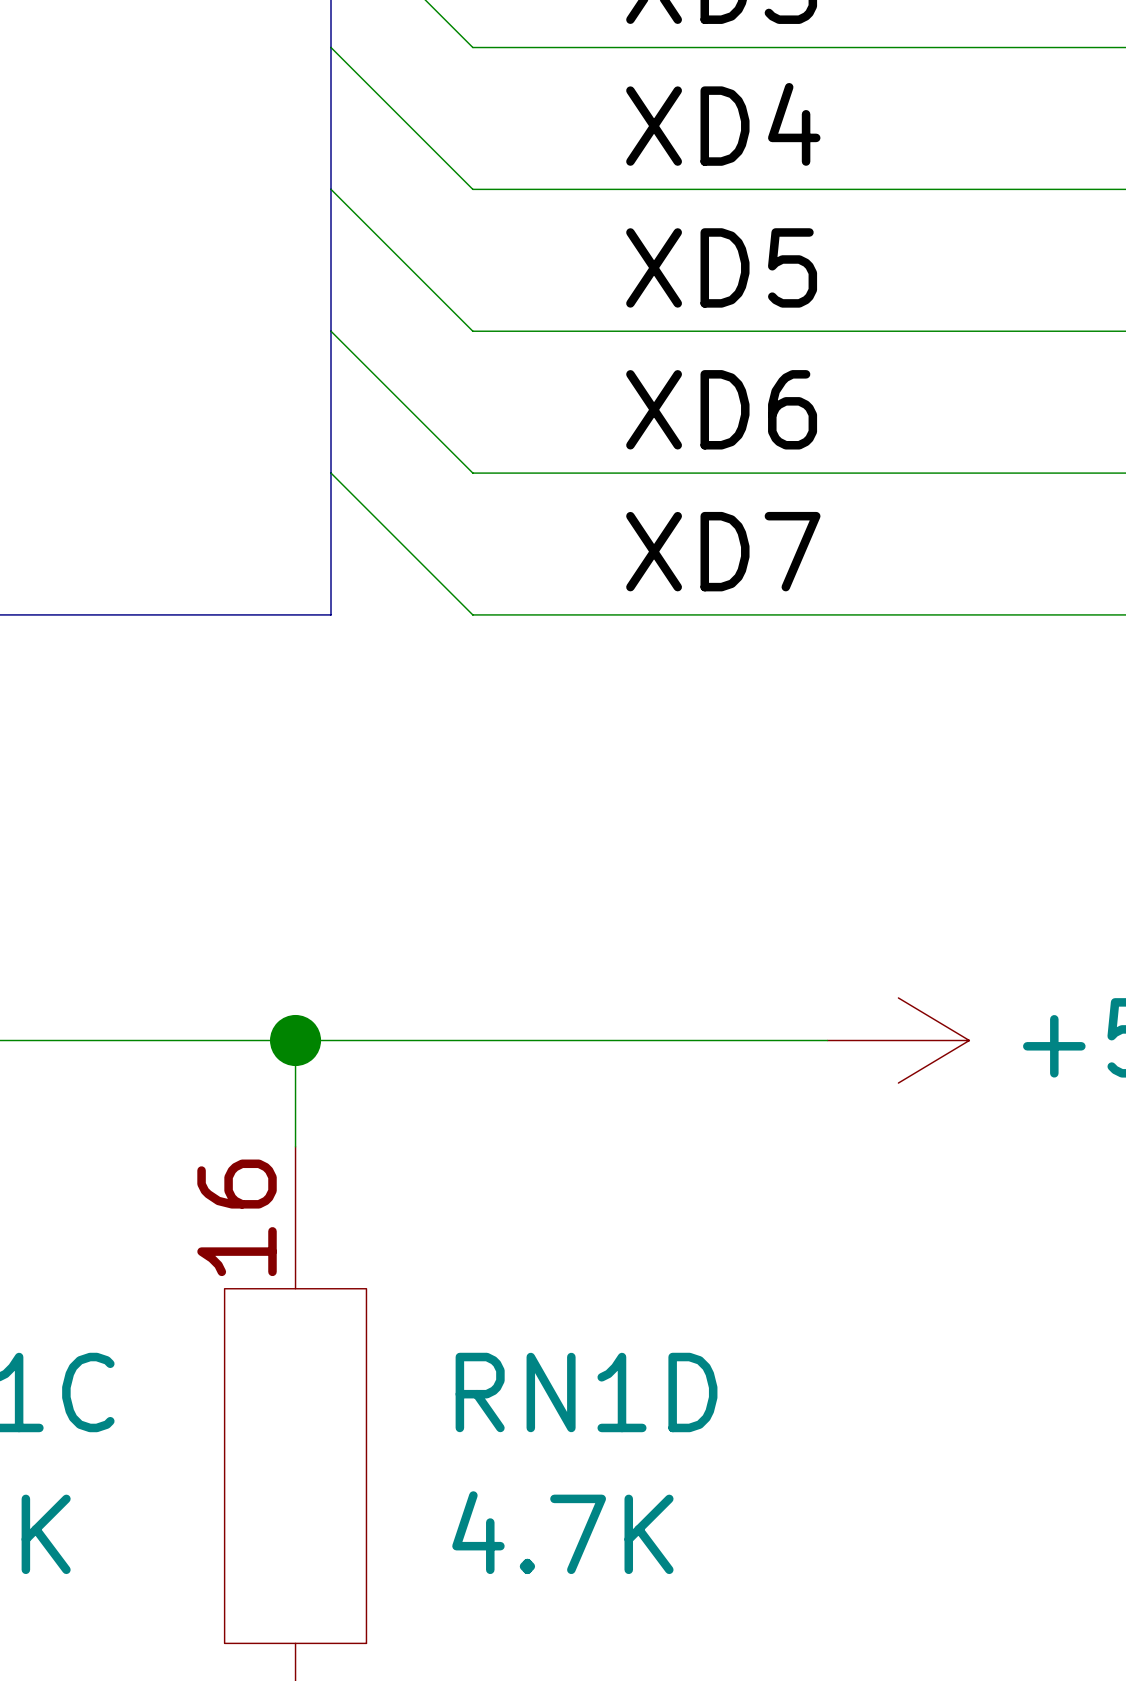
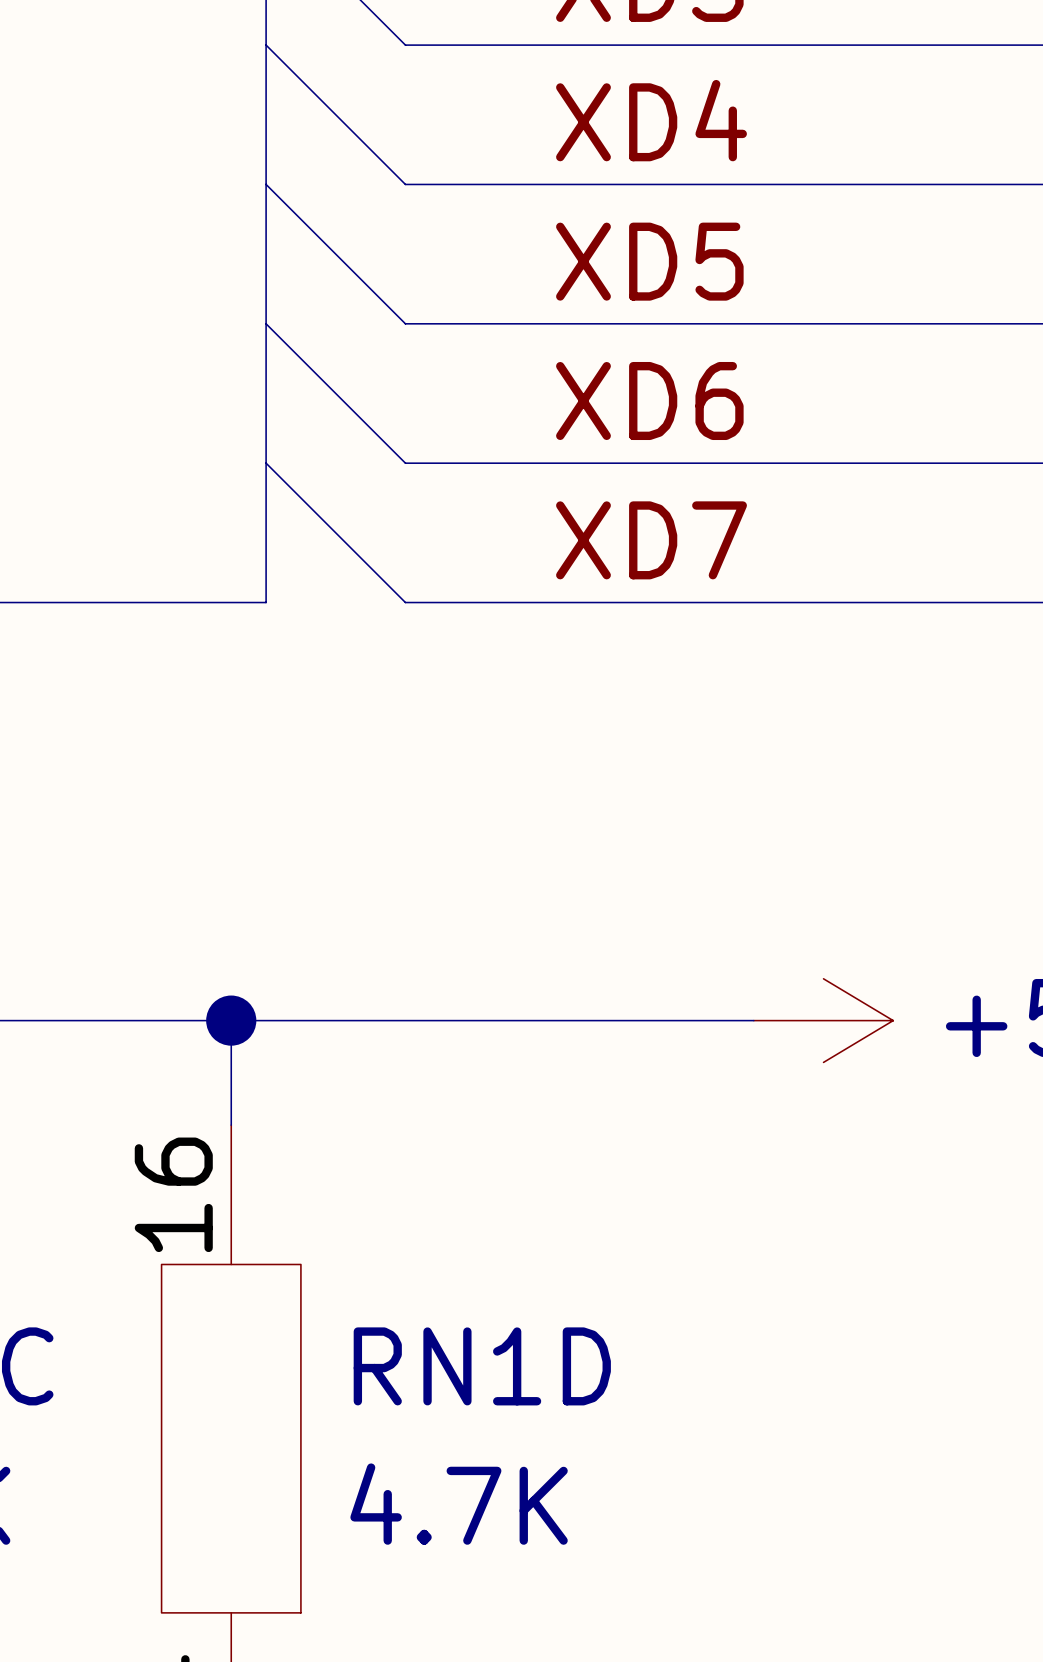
RN1D name position: RN1D (586, 1392) -> RN1D (482, 1366)
RN1D value position: 4.7K (562, 1532) -> 4.7K (459, 1504)

